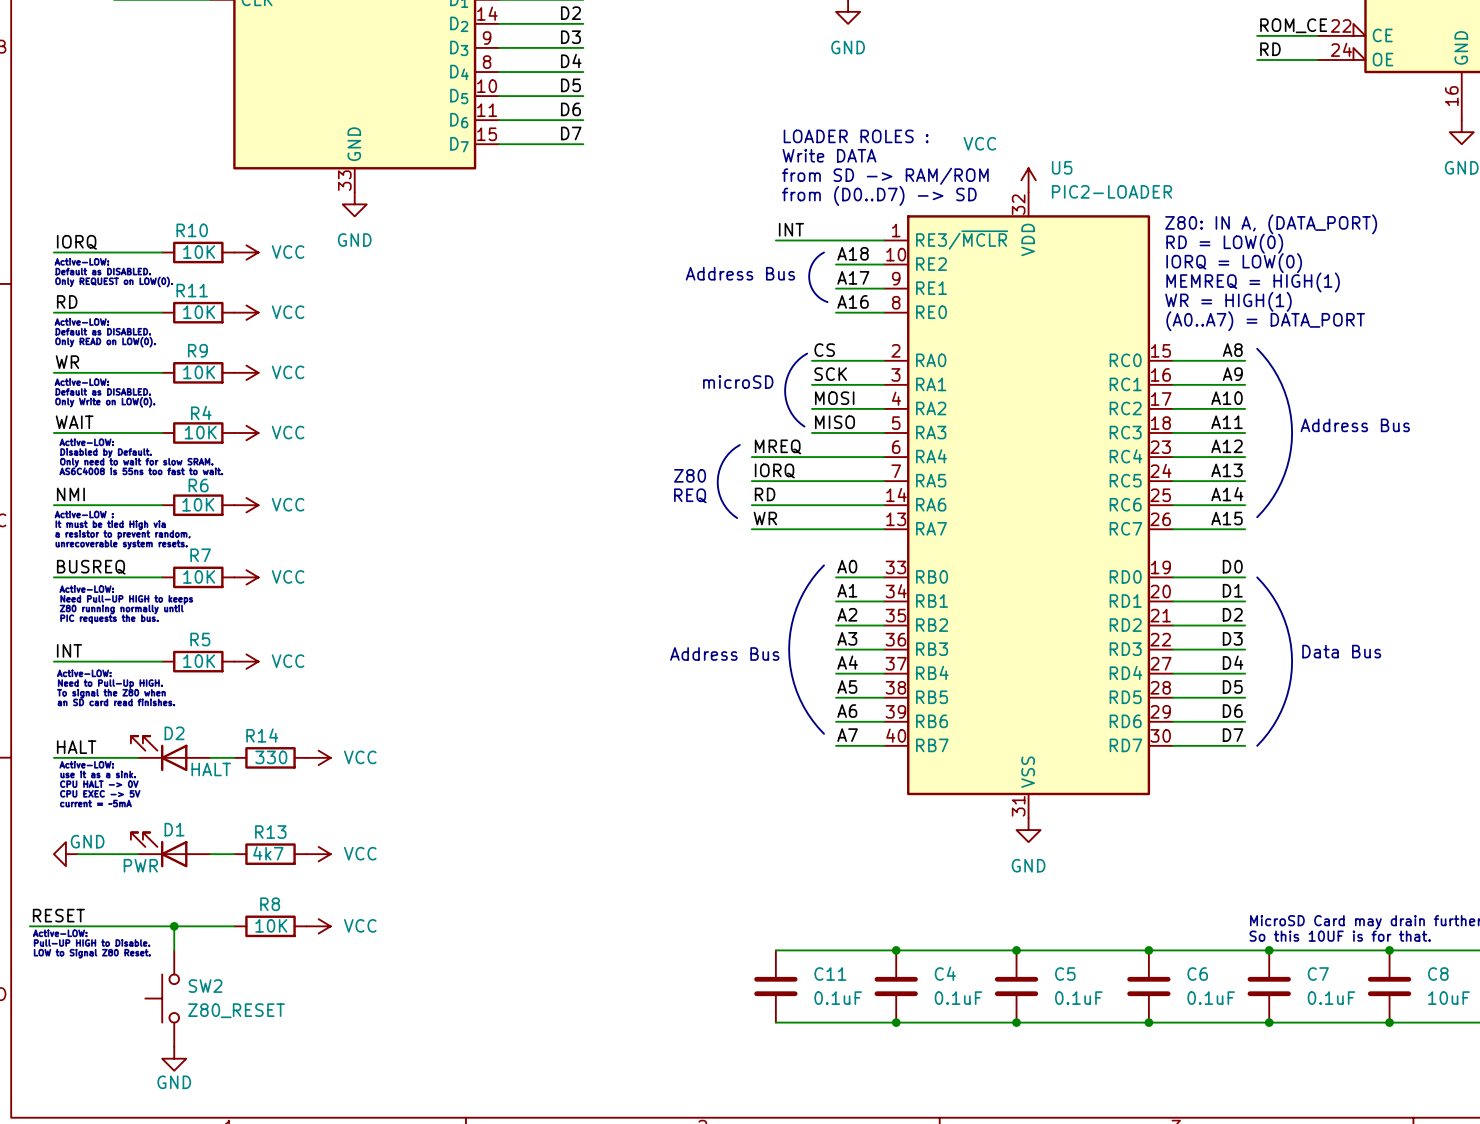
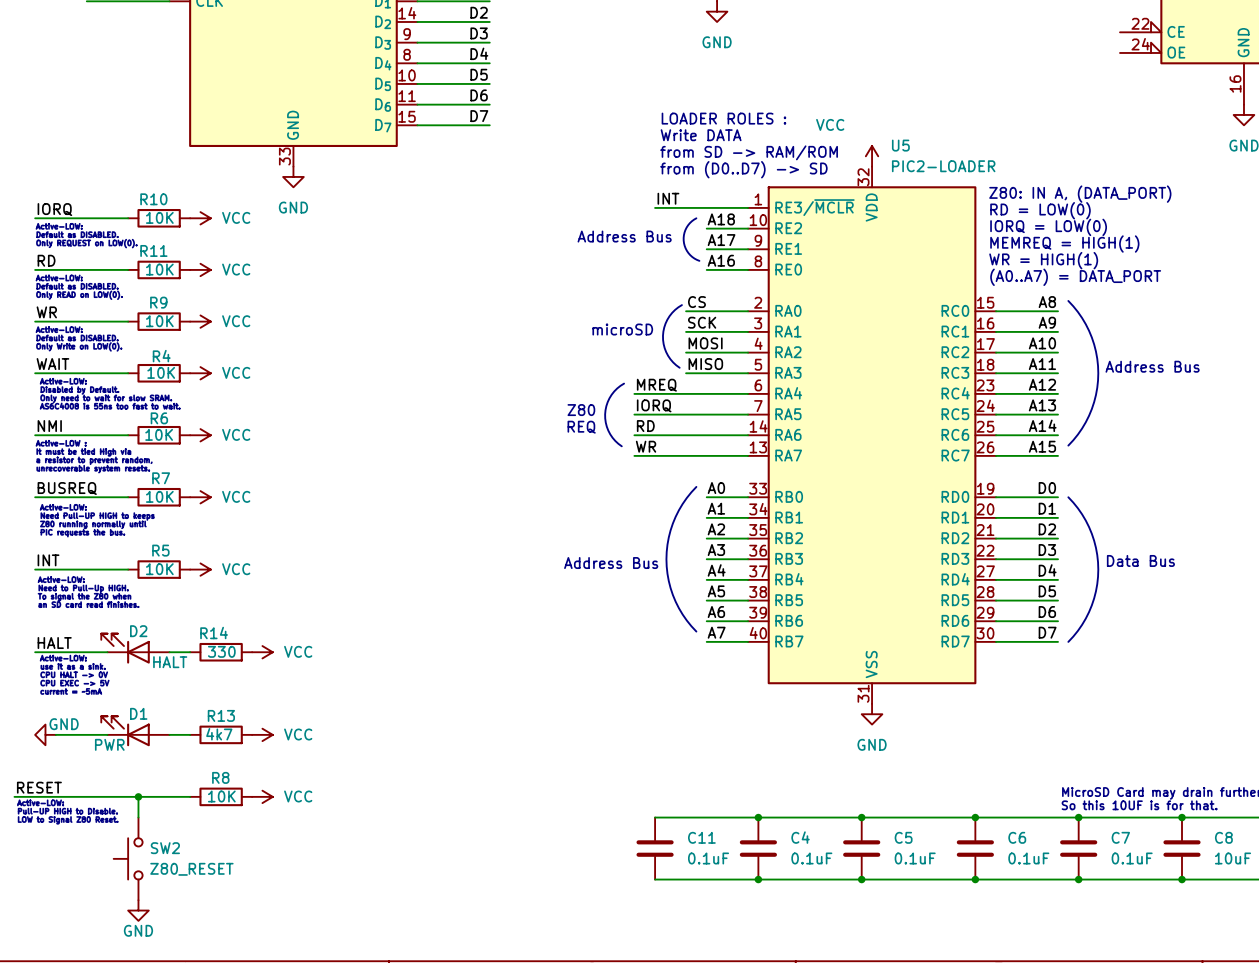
label: ROM_CE (1293, 25) -> none
wire: (1257, 35) (1317, 35) -> none
label: RD (1270, 49) -> none
wire: (1257, 59) (1317, 59) -> none

